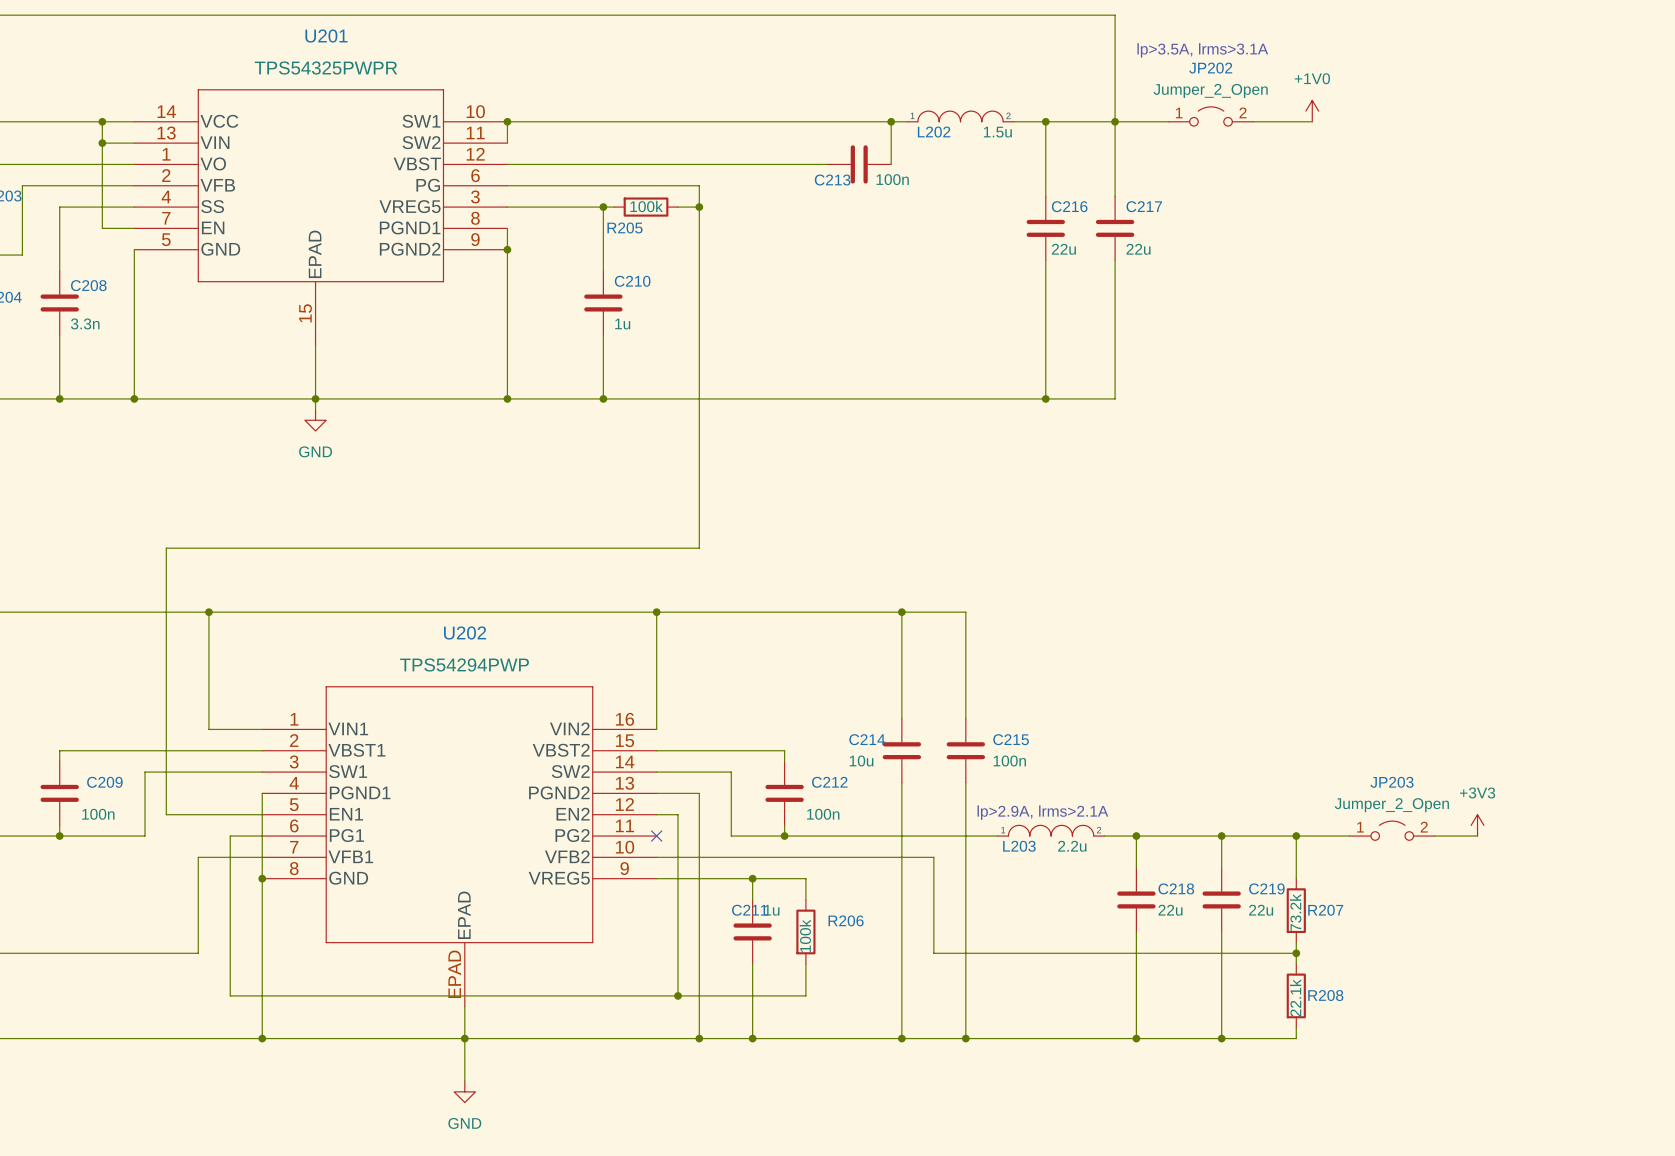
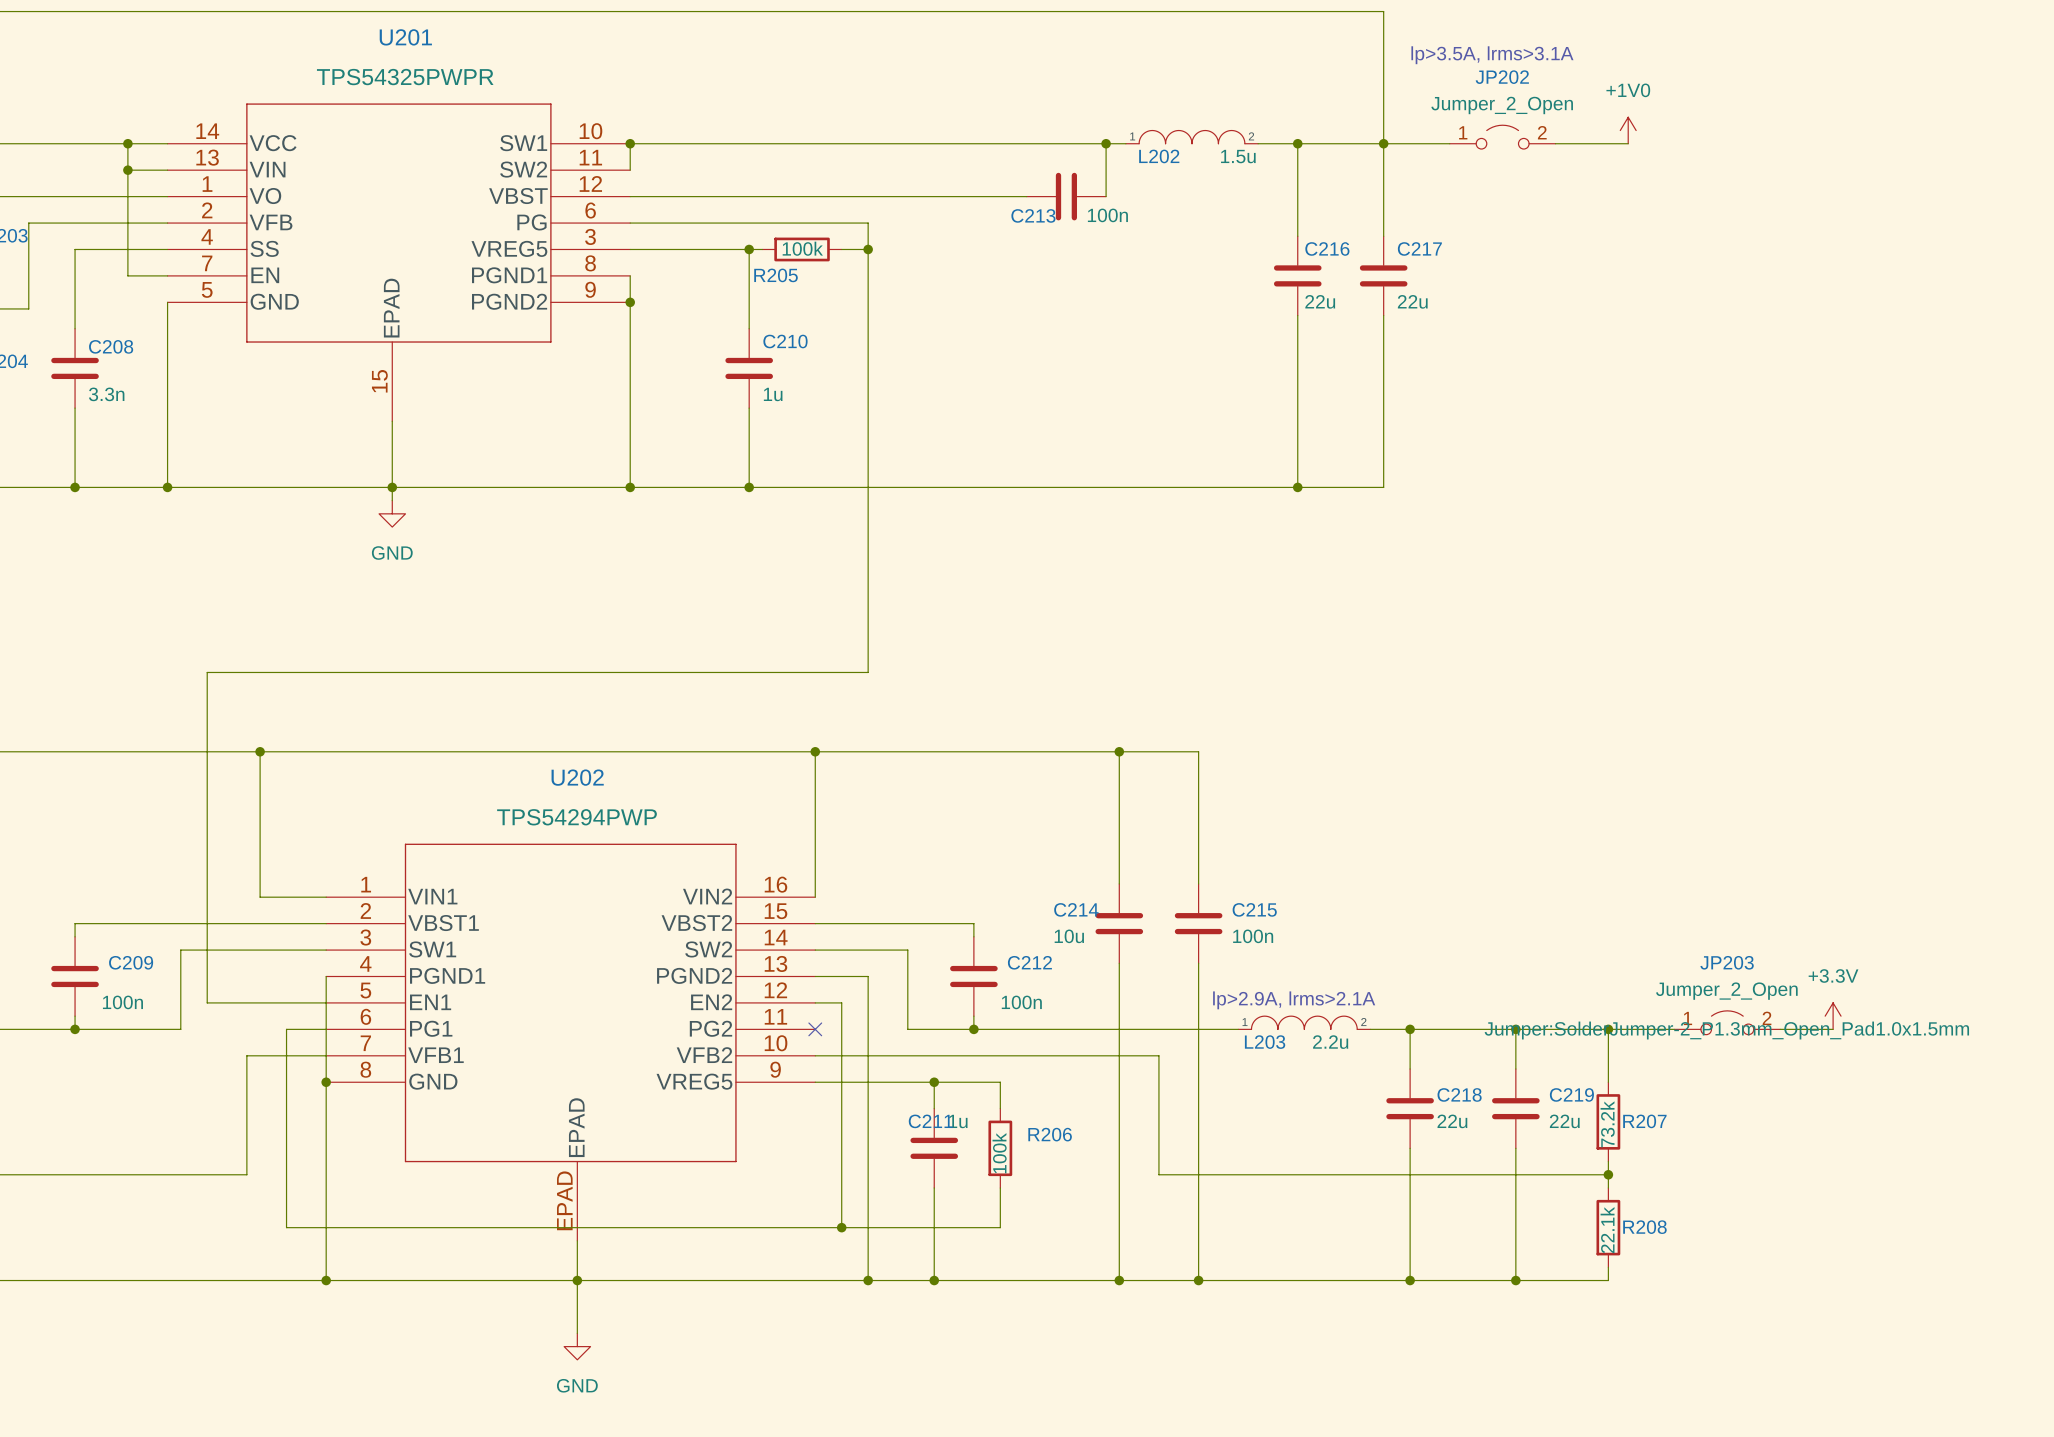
power symbol: +3V3 (1477, 825) -> +3.3V (1833, 1016)
JP203 text: none -> Jumper:SolderJumper-2_P1.3mm_Open_Pad1.0x1.5mm (1726, 1030)

